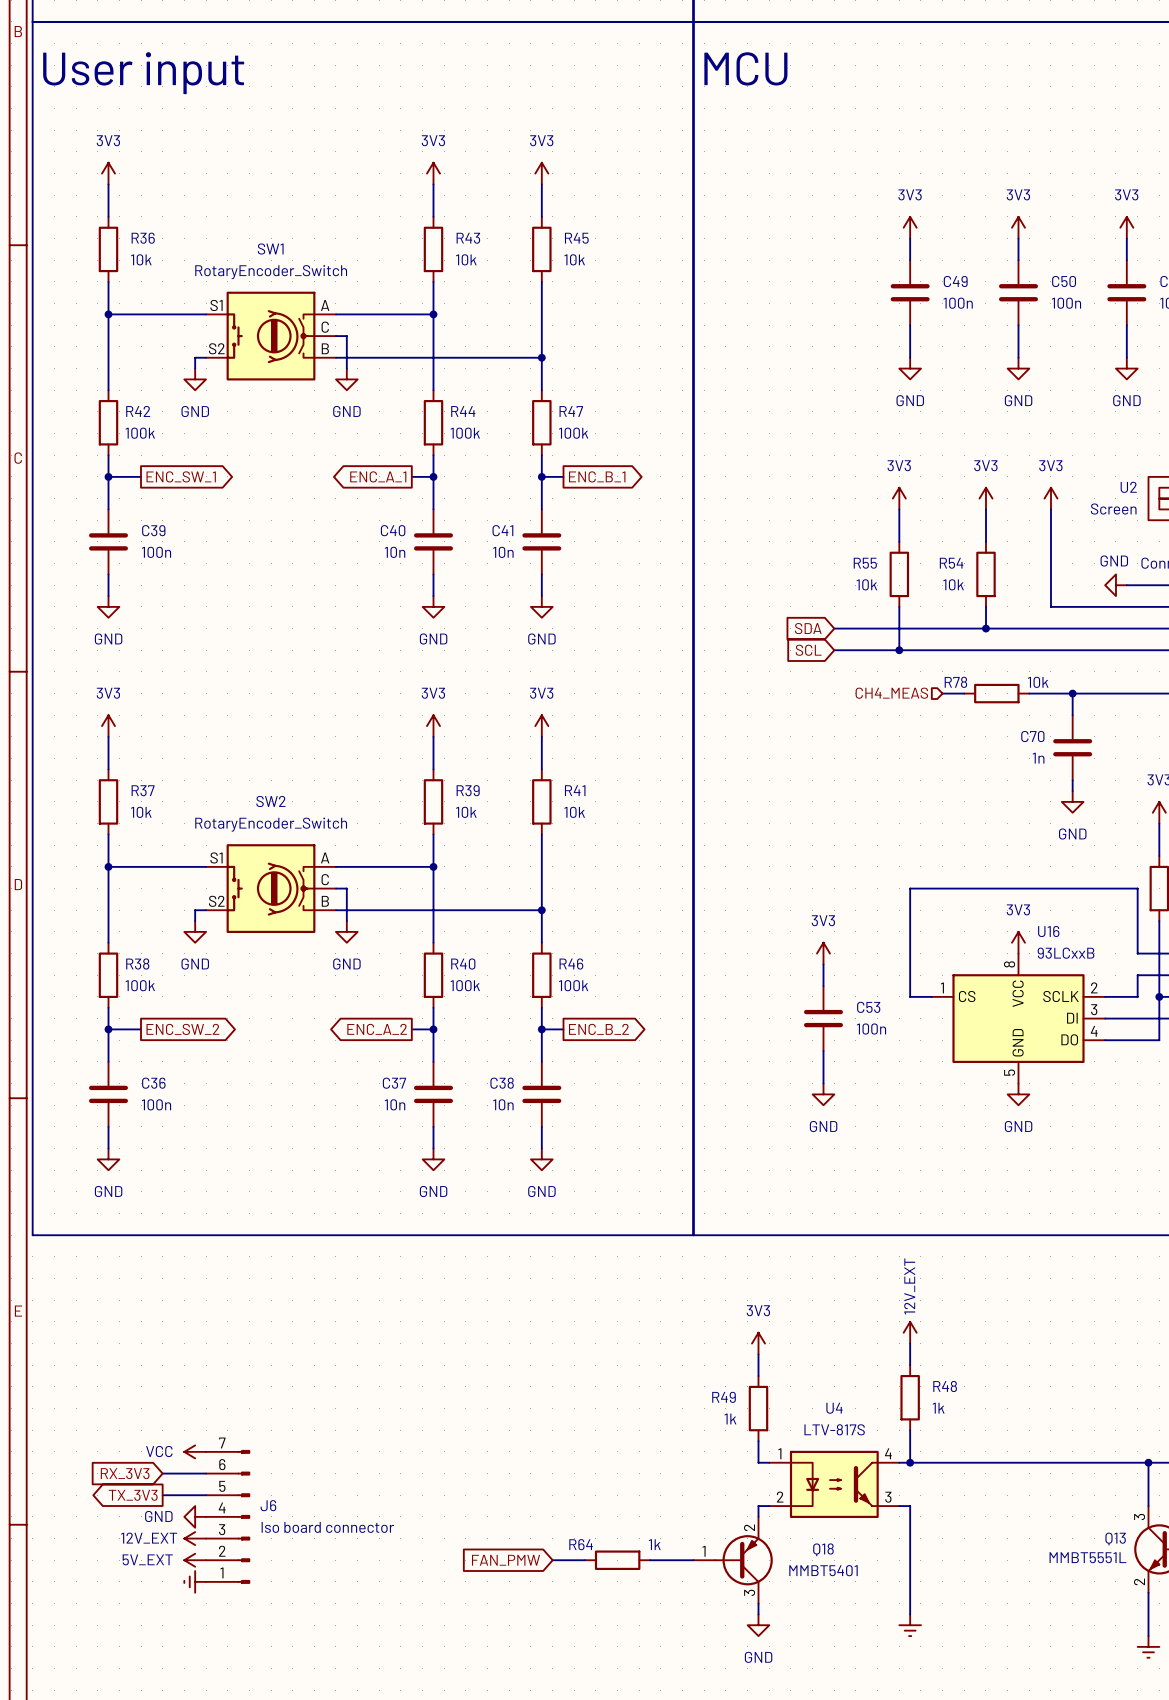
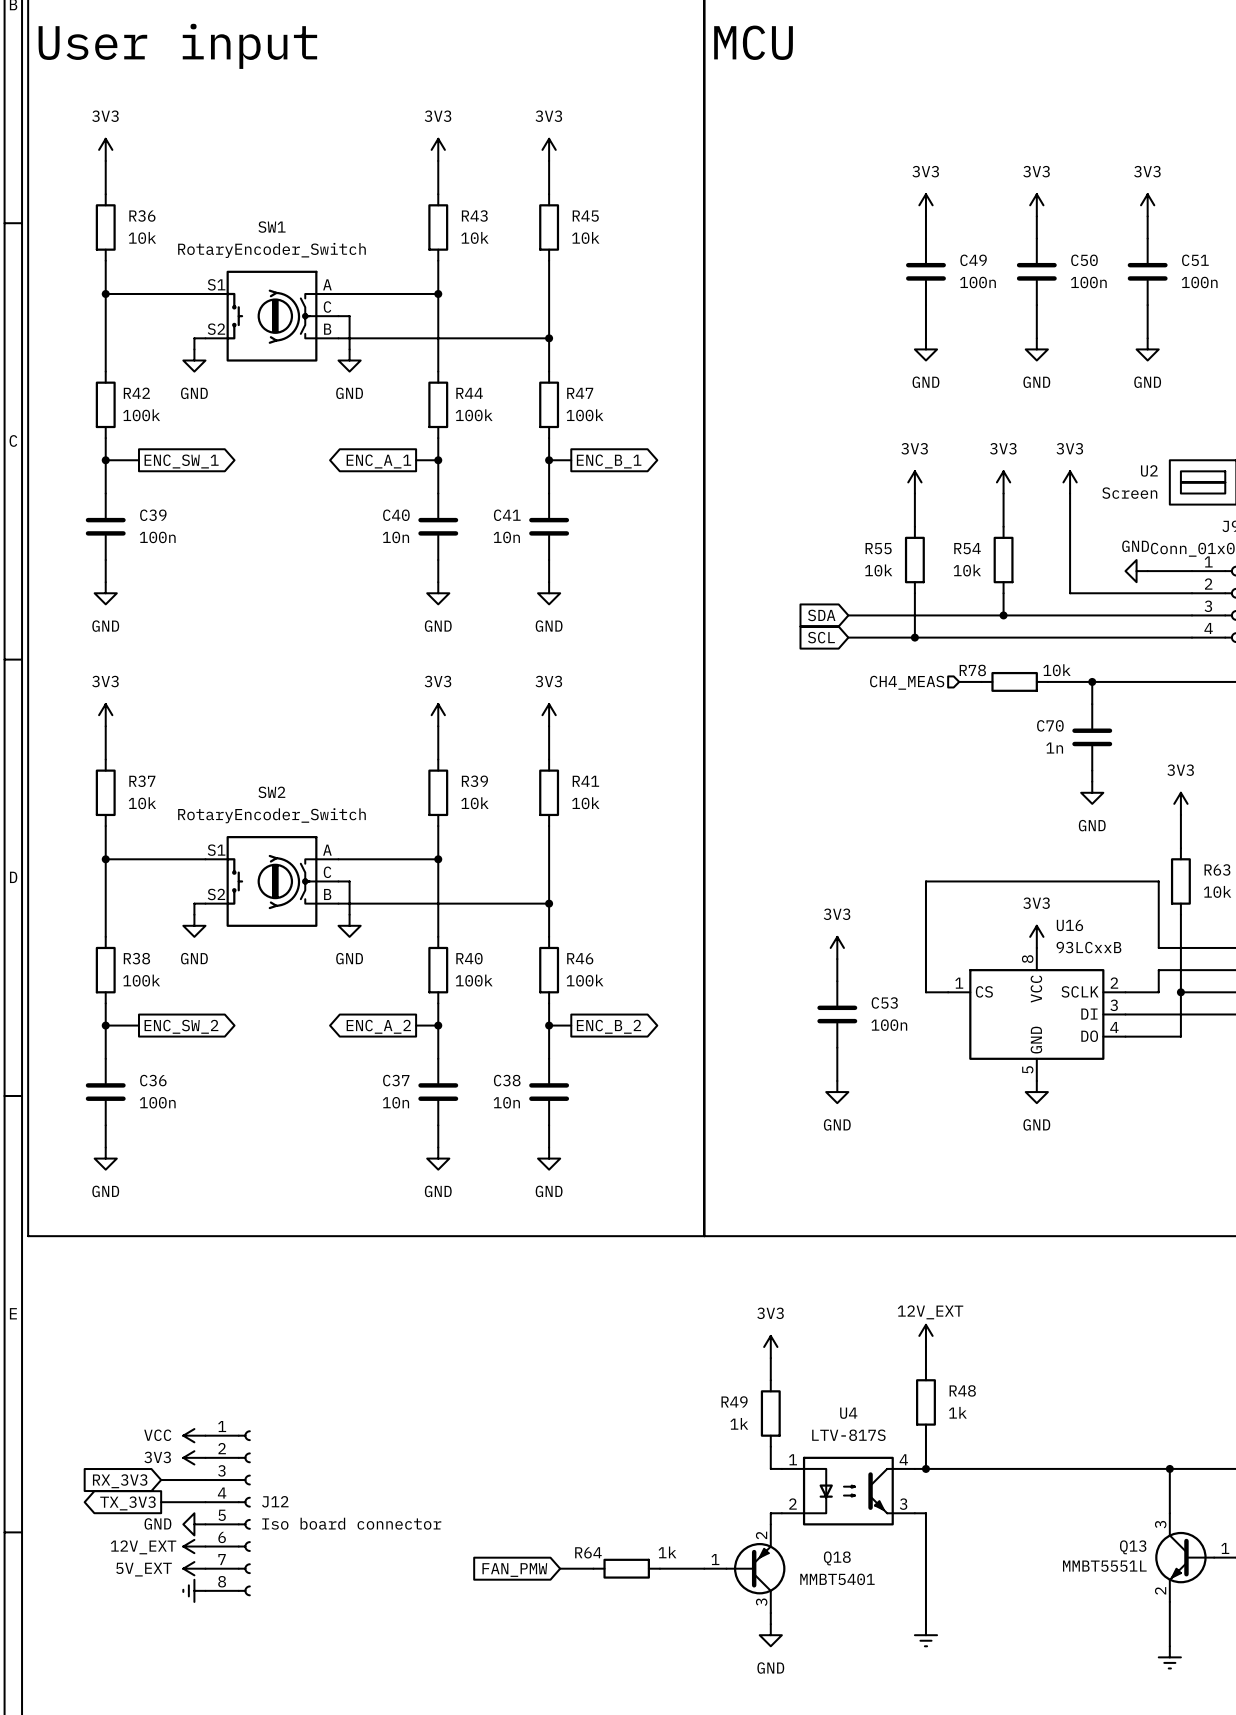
power symbol text rotation: 0° (909, 1286) -> 90° clockwise (930, 1312)
power symbol: none -> VCC (194, 1435)
power symbol: VCC (195, 1451) -> 3V3 (194, 1457)
J12: none -> Iso board connector (227, 1513)
J6: Iso board connector (227, 1516) -> none

